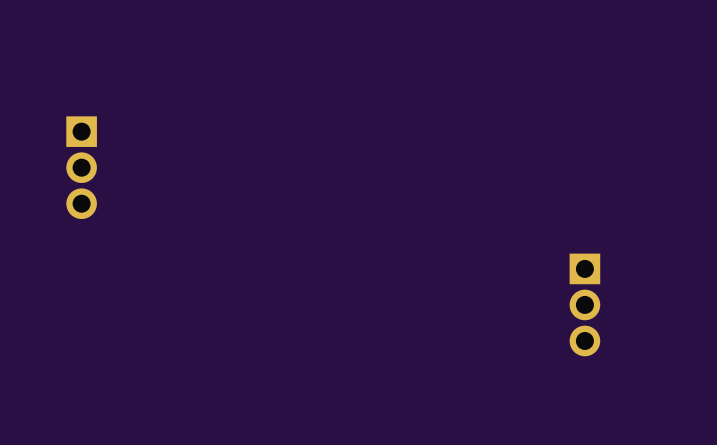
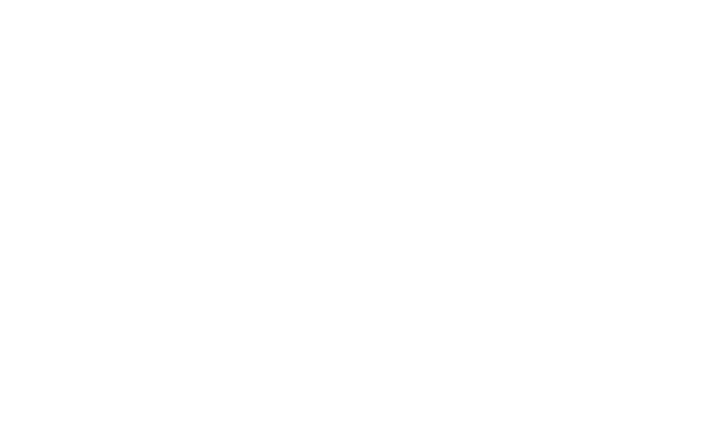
part: (81, 167) -> none
part: (584, 304) -> none

